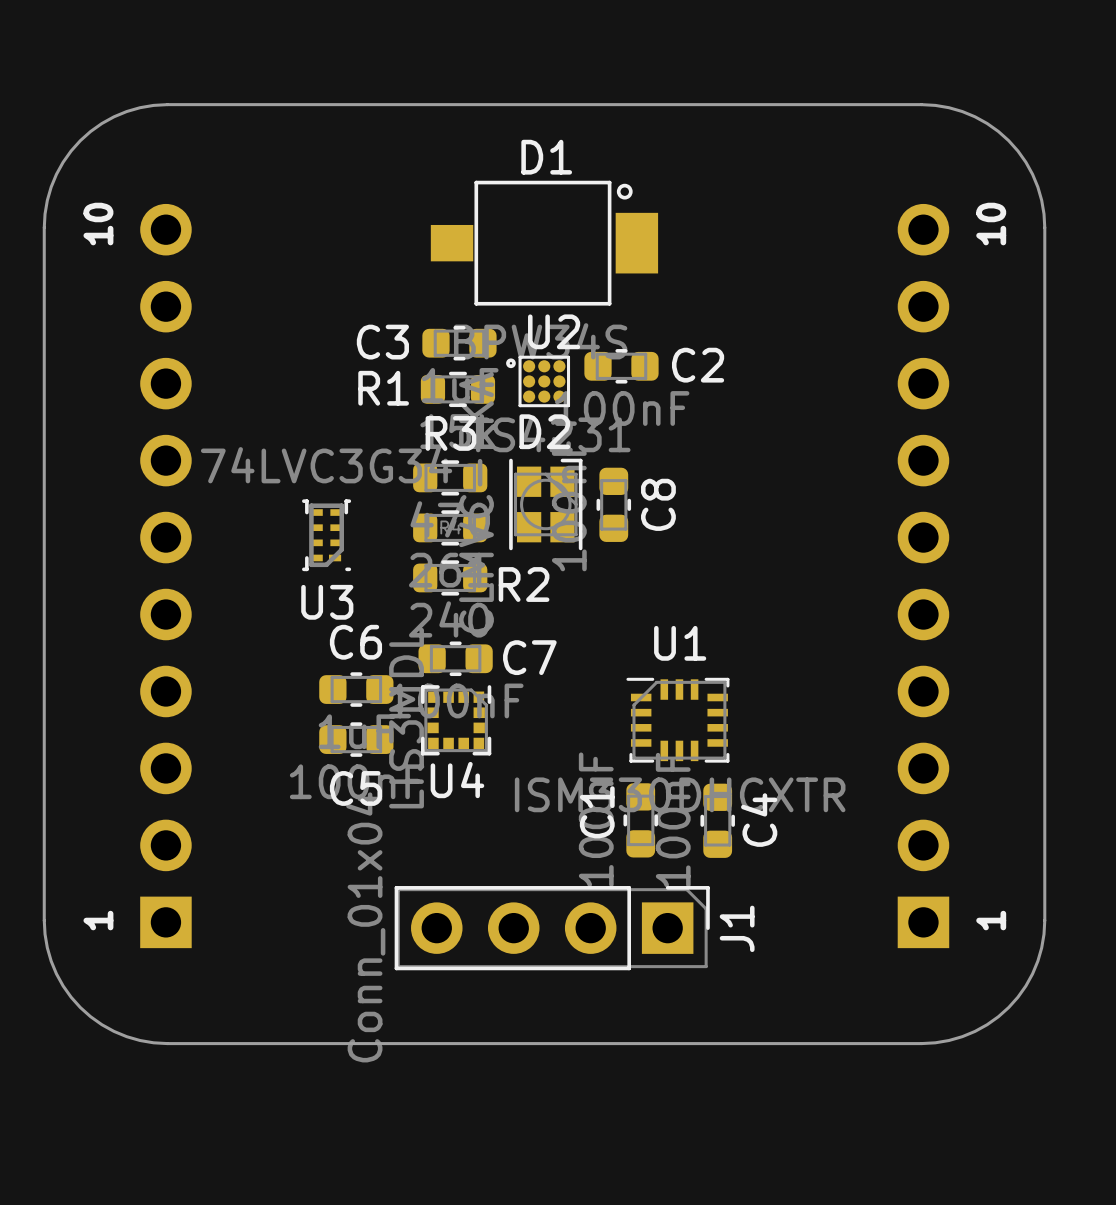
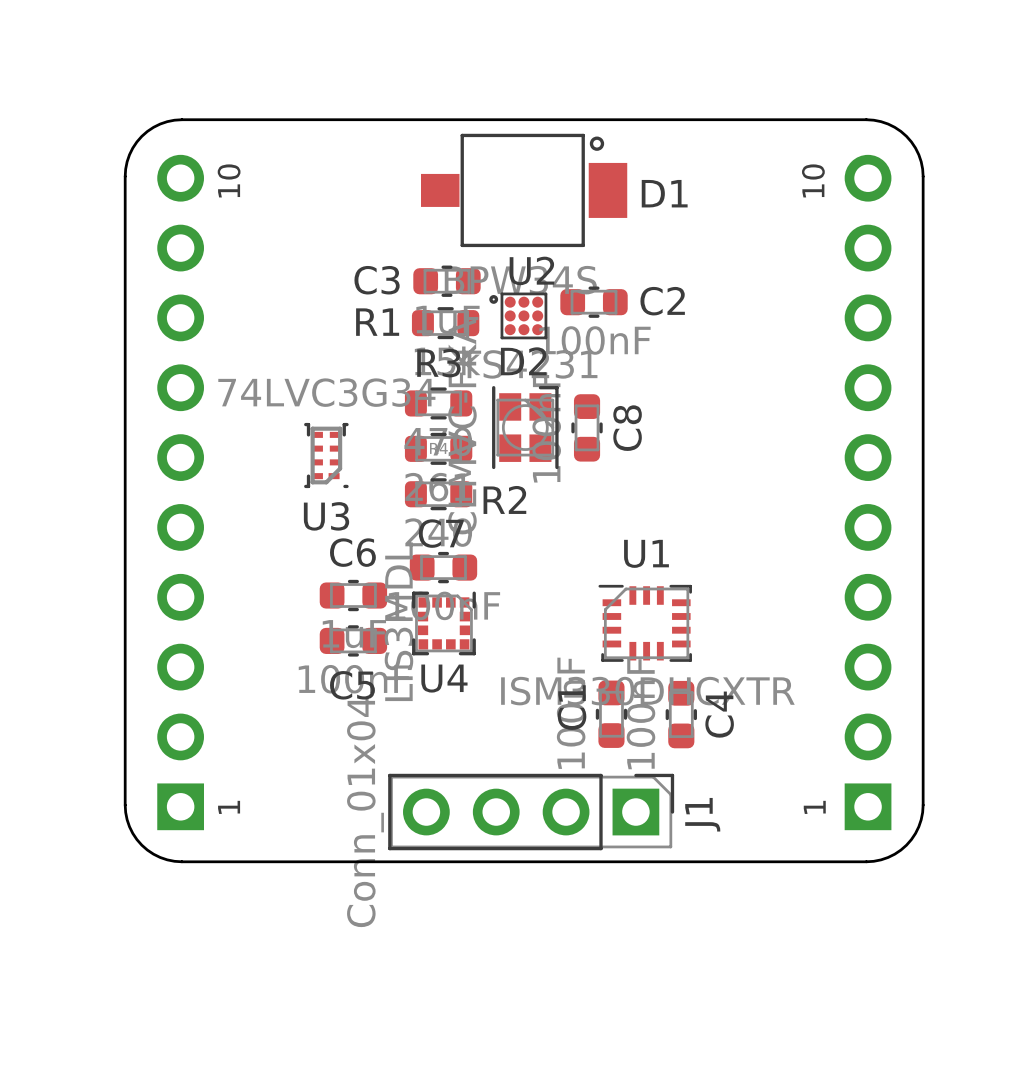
board edge: (167, 104) (921, 104) (949, 107) (962, 111) (987, 123) (1008, 140) (1017, 150) (1032, 174) (1041, 200) (1044, 227) (1044, 920) (1041, 947) (1037, 961) (1025, 985) (1008, 1007) (987, 1024) (975, 1031) (949, 1040) (921, 1043) (167, 1043) (140, 1040) (113, 1031) (90, 1016) (80, 1007) (63, 985) (56, 973) (47, 947) (44, 920) (45, 213) (51, 187) (56, 174) (71, 150) (80, 140) (101, 123) (113, 116) (140, 107) (167, 104) -> (181, 119) (160, 124) (141, 136) (129, 154) (125, 176) (125, 805) (129, 826) (141, 845) (160, 857) (181, 861) (866, 861) (888, 857) (906, 845) (918, 826) (923, 805) (923, 176) (918, 154) (906, 136) (888, 124) (866, 119) (181, 119)
D1 name position: D1 (546, 157) -> D1 (664, 193)
text position: 10 (98, 224) -> 10 (229, 180)
text position: 10 (991, 224) -> 10 (813, 180)
C7 name position: C7 (529, 657) -> C7 (441, 533)
text position: 1 (98, 920) -> 1 (229, 807)
text position: 1 (991, 920) -> 1 (814, 807)

